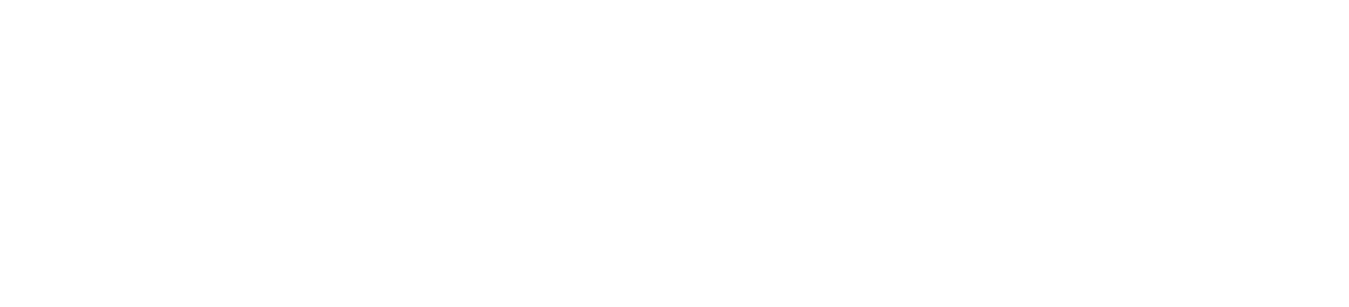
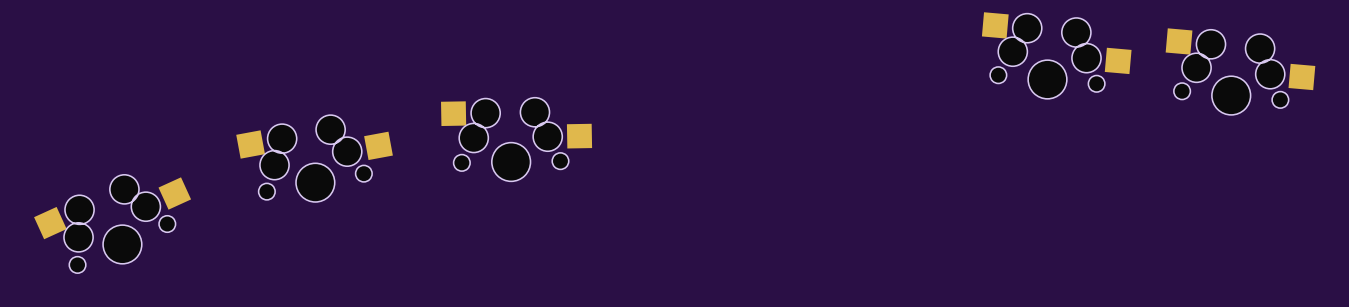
part: none -> (1056, 55)
part: none -> (1240, 71)
part: none -> (516, 139)
part: none -> (314, 158)
part: none -> (112, 223)

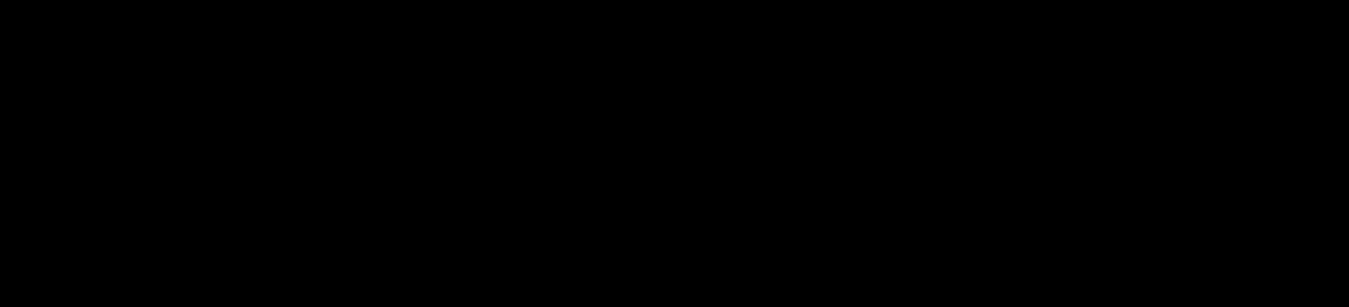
part: (1056, 55) -> none
part: (1240, 71) -> none
part: (516, 139) -> none
part: (314, 158) -> none
part: (112, 223) -> none

